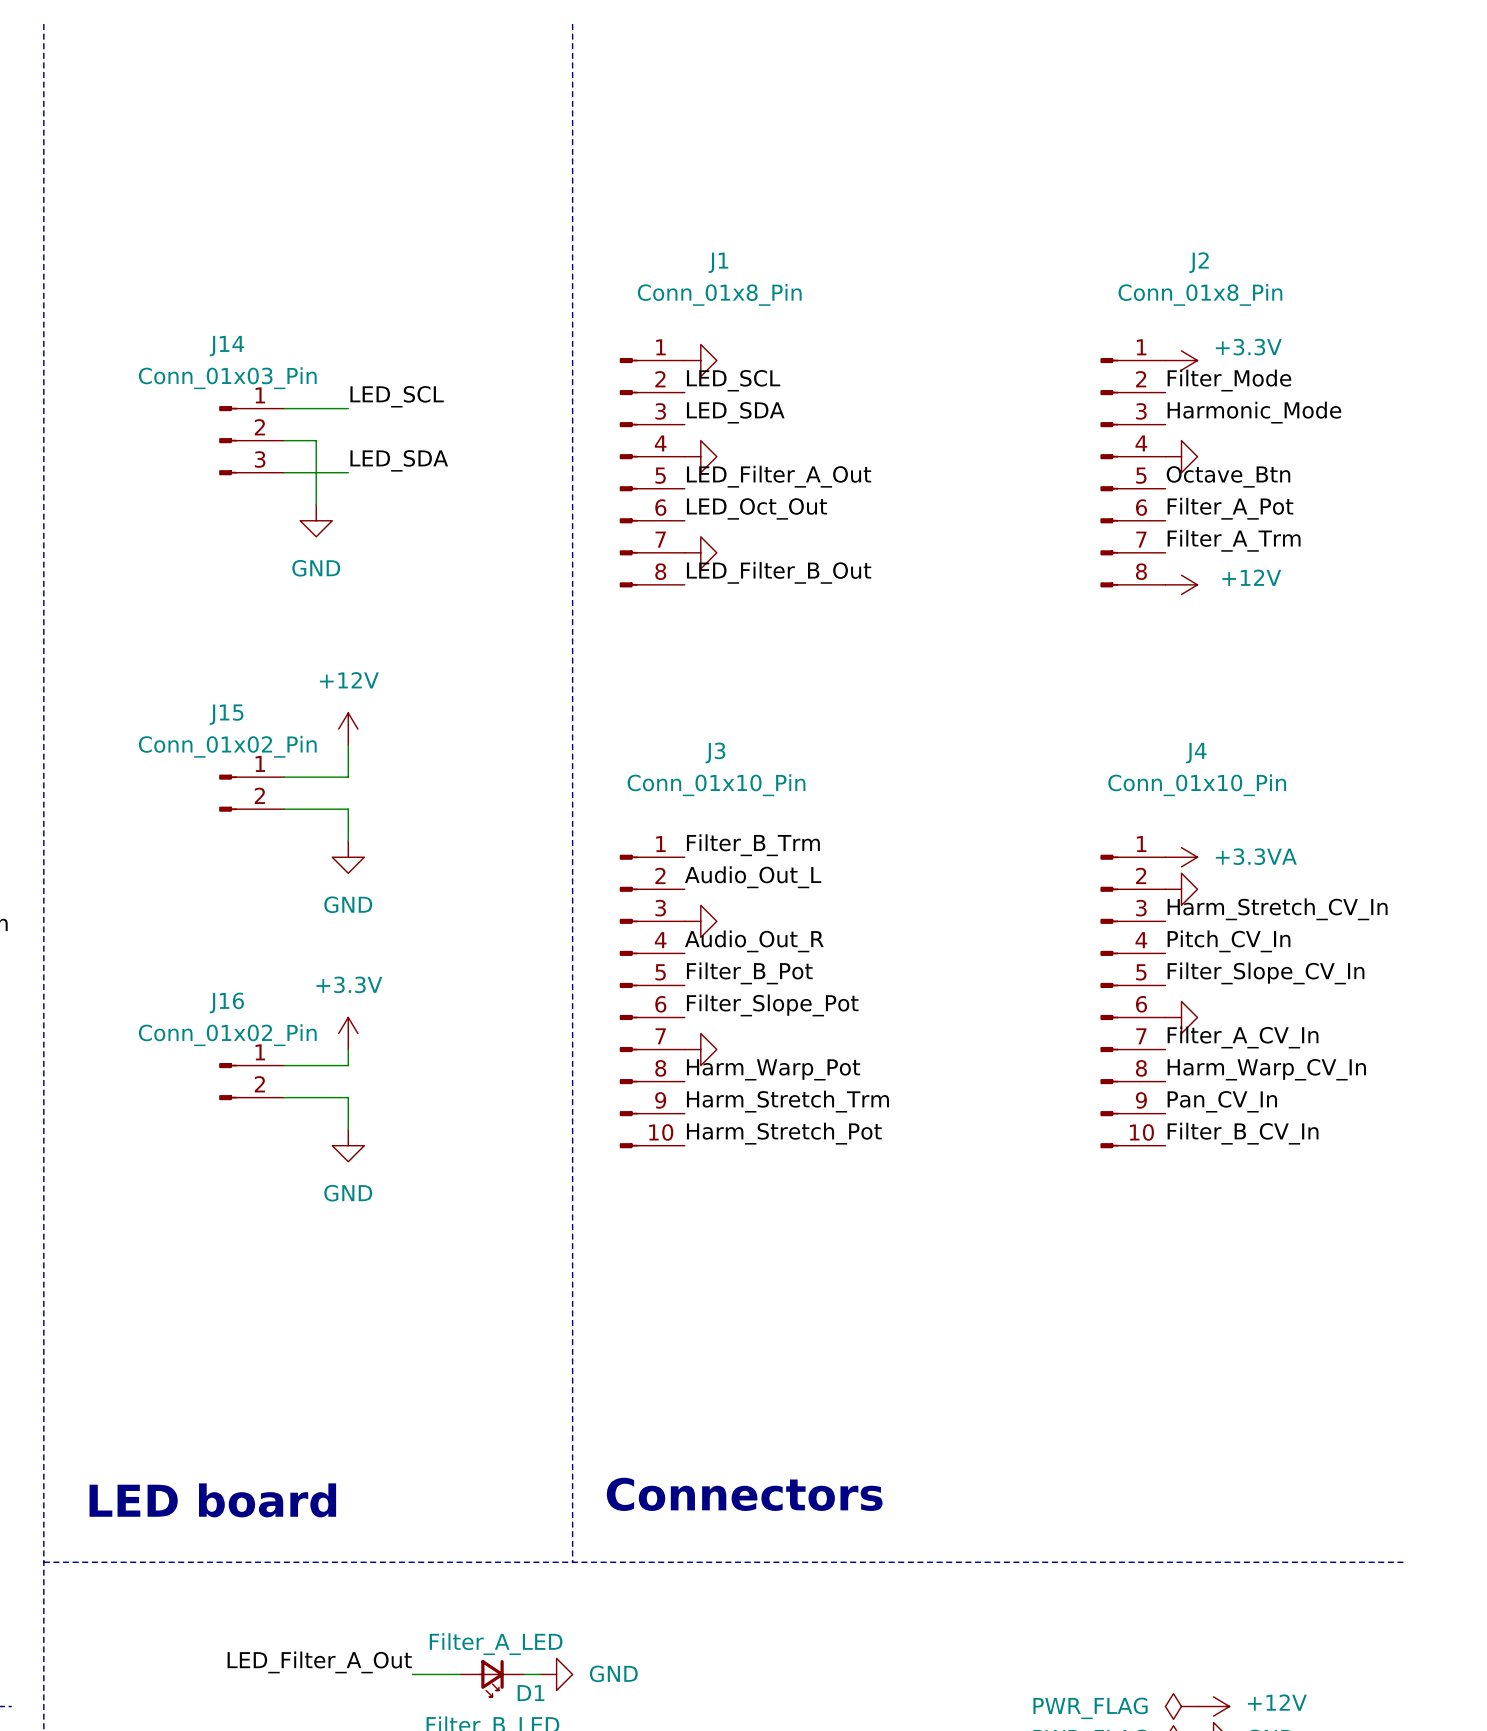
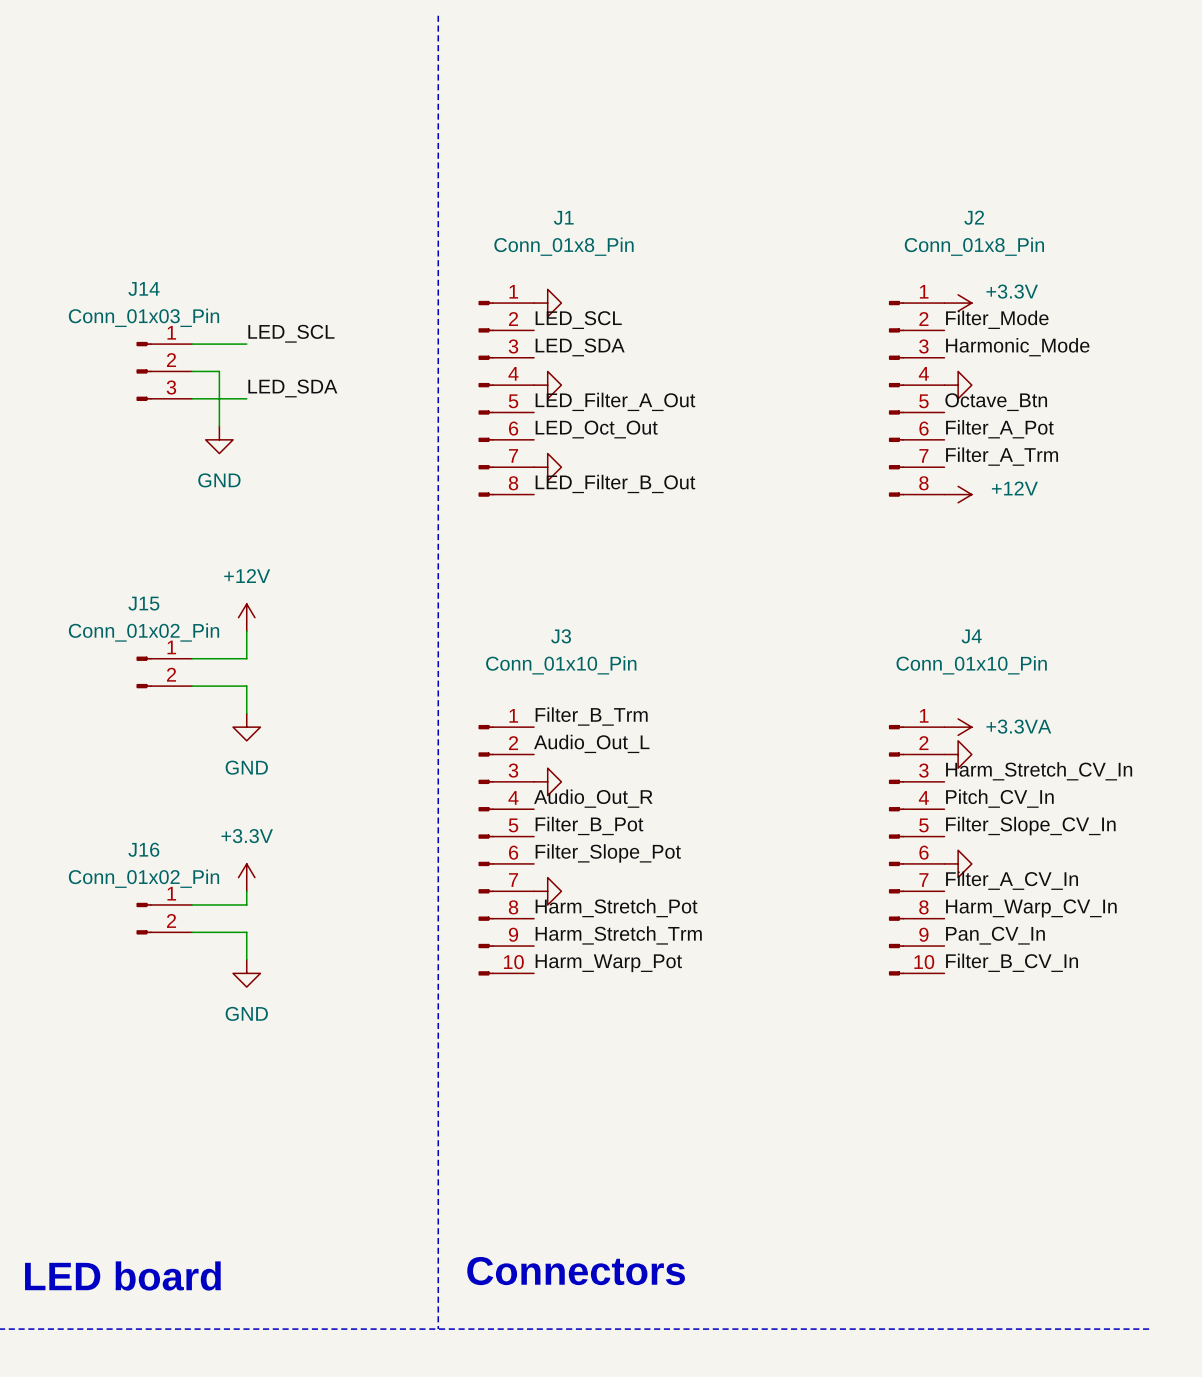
label: Harm_Warp_Pot (773, 1069) -> Harm_Stretch_Pot (616, 908)
label: Harm_Stretch_Pot (784, 1133) -> Harm_Warp_Pot (608, 963)

